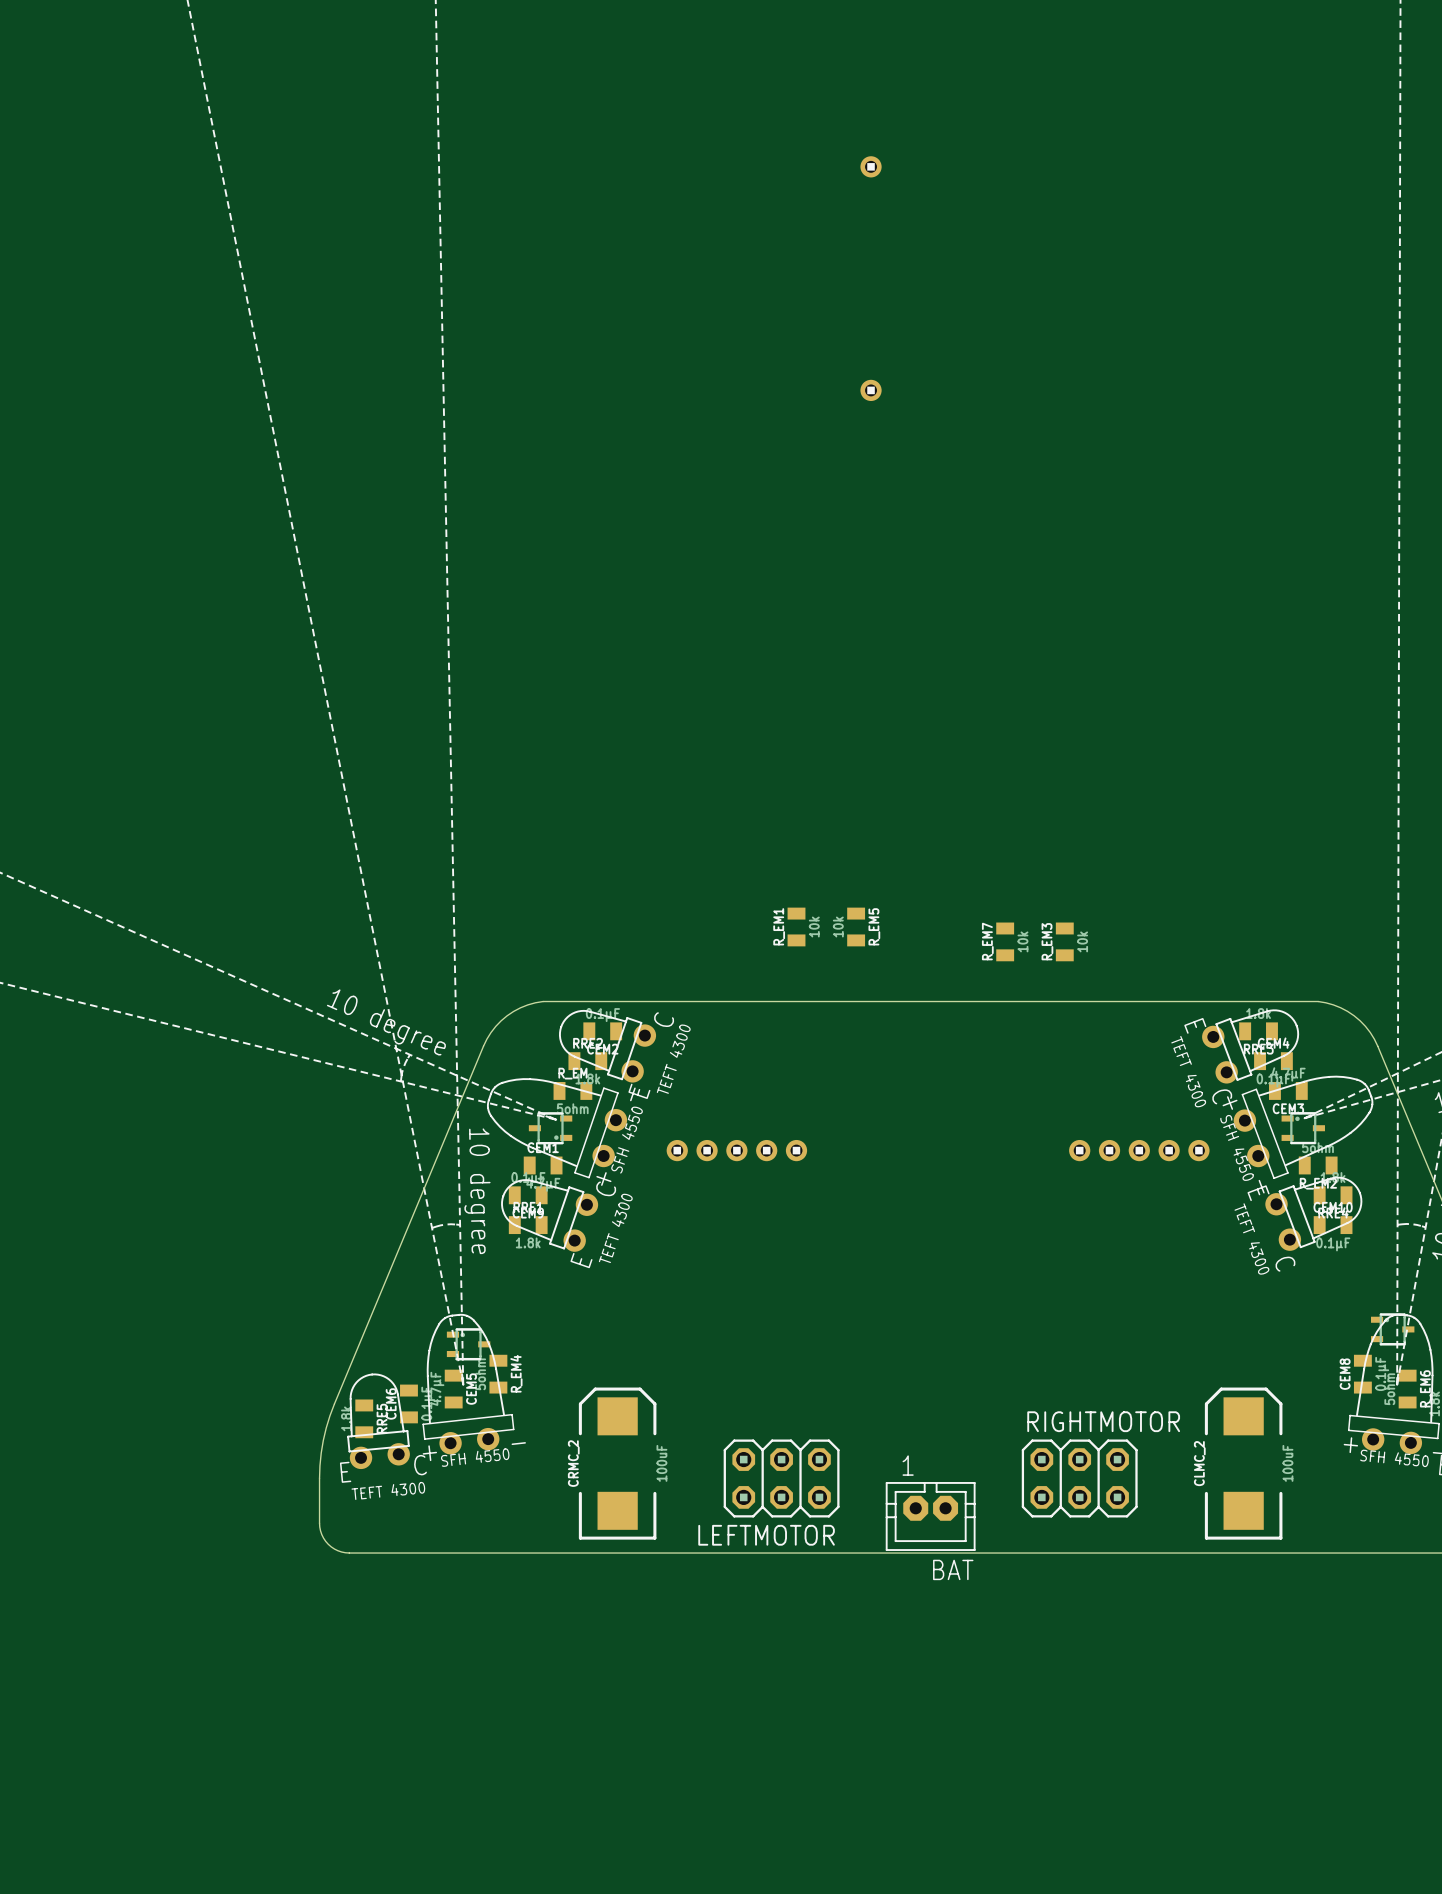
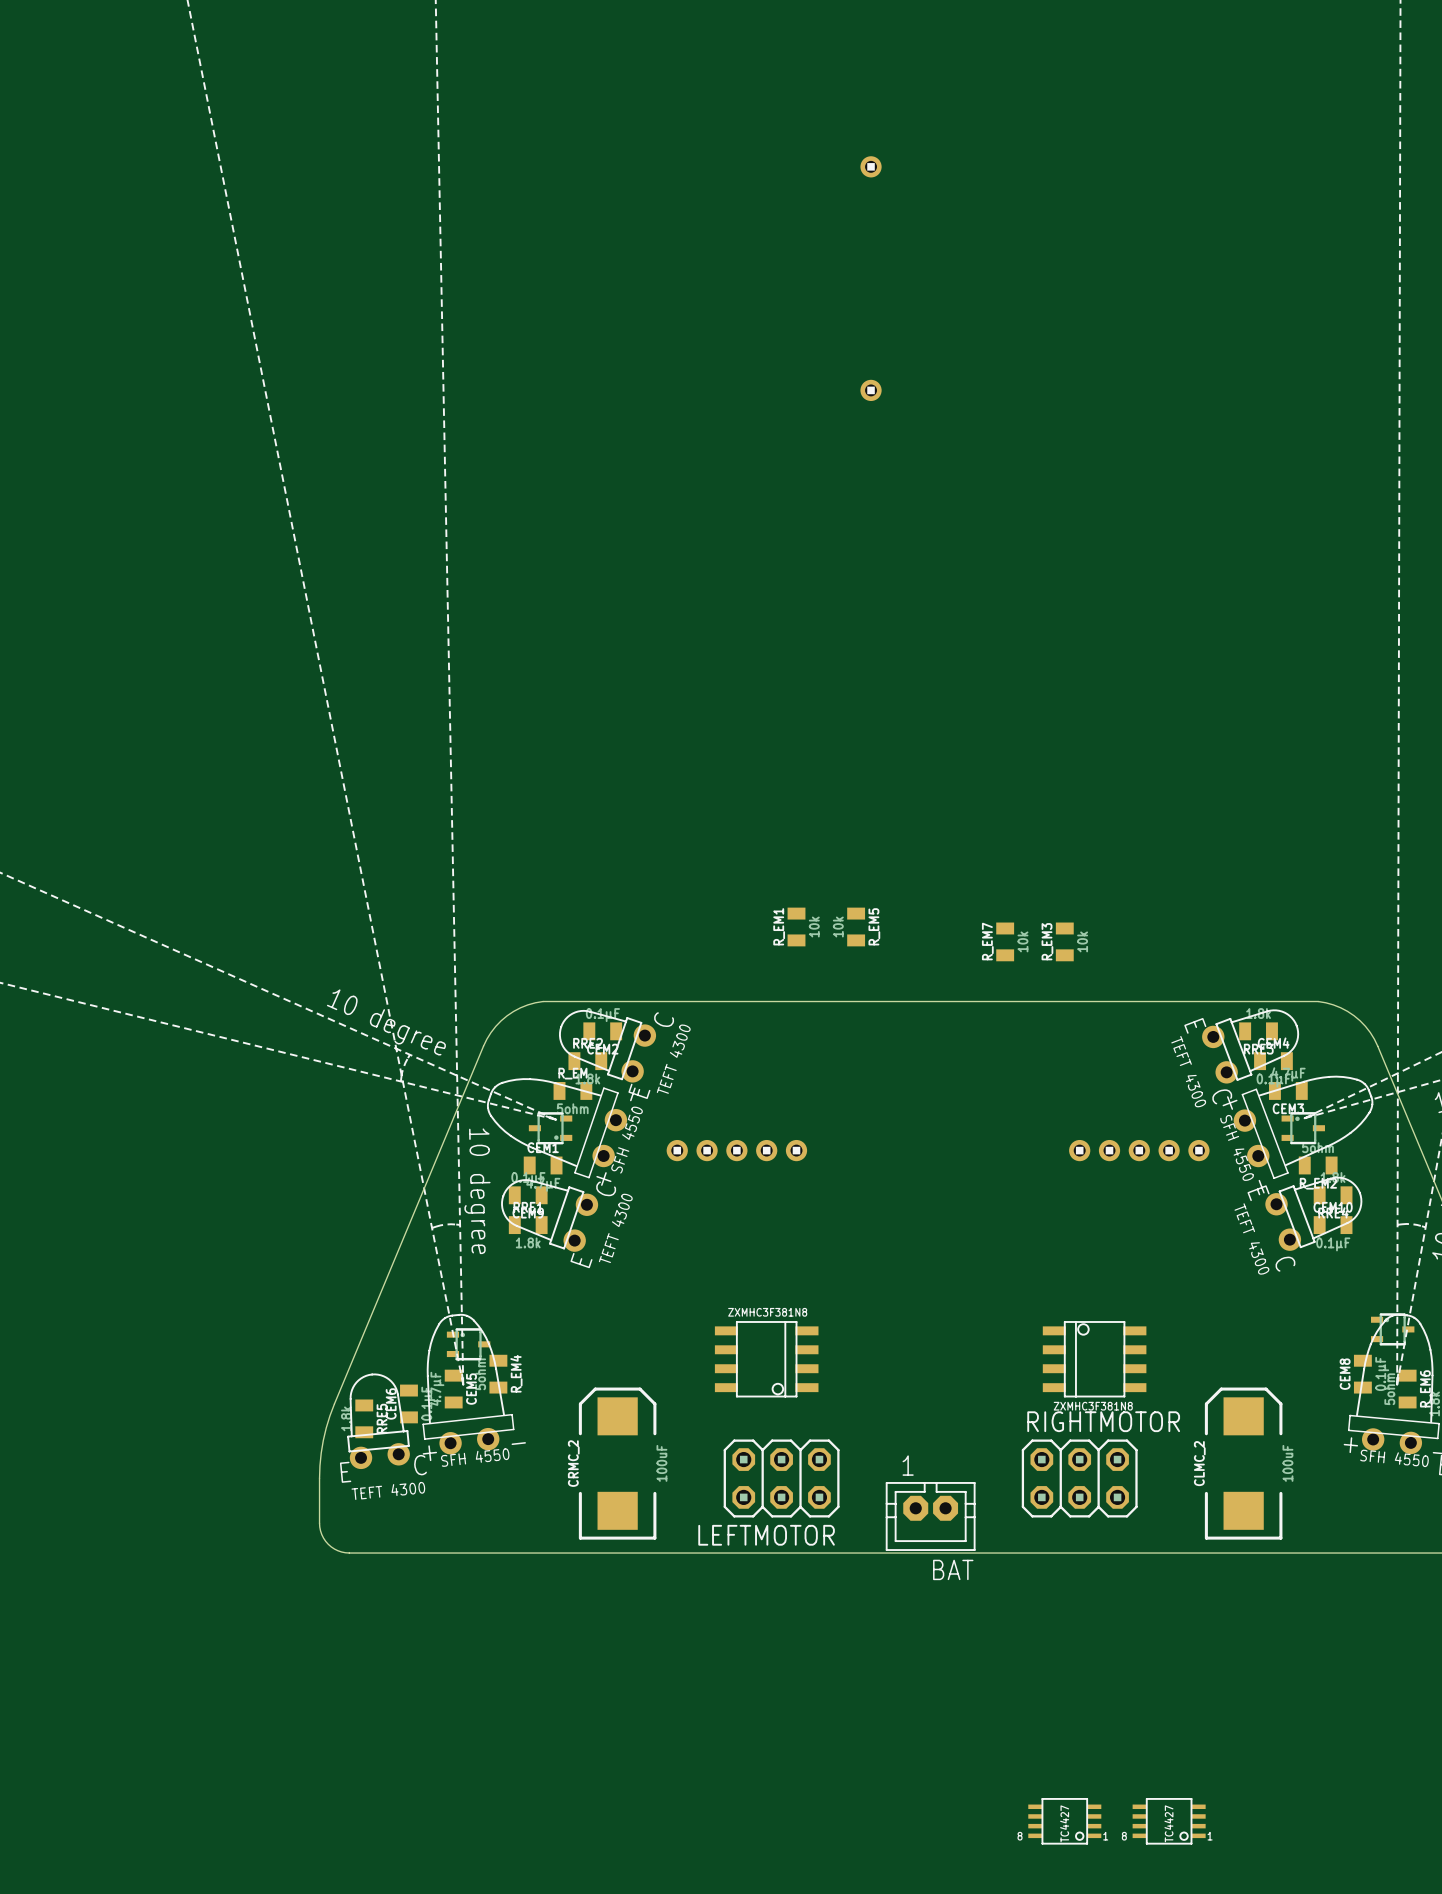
part: none -> (766, 1359)
part: none -> (1094, 1359)
part: none -> (1064, 1821)
part: none -> (1169, 1821)

